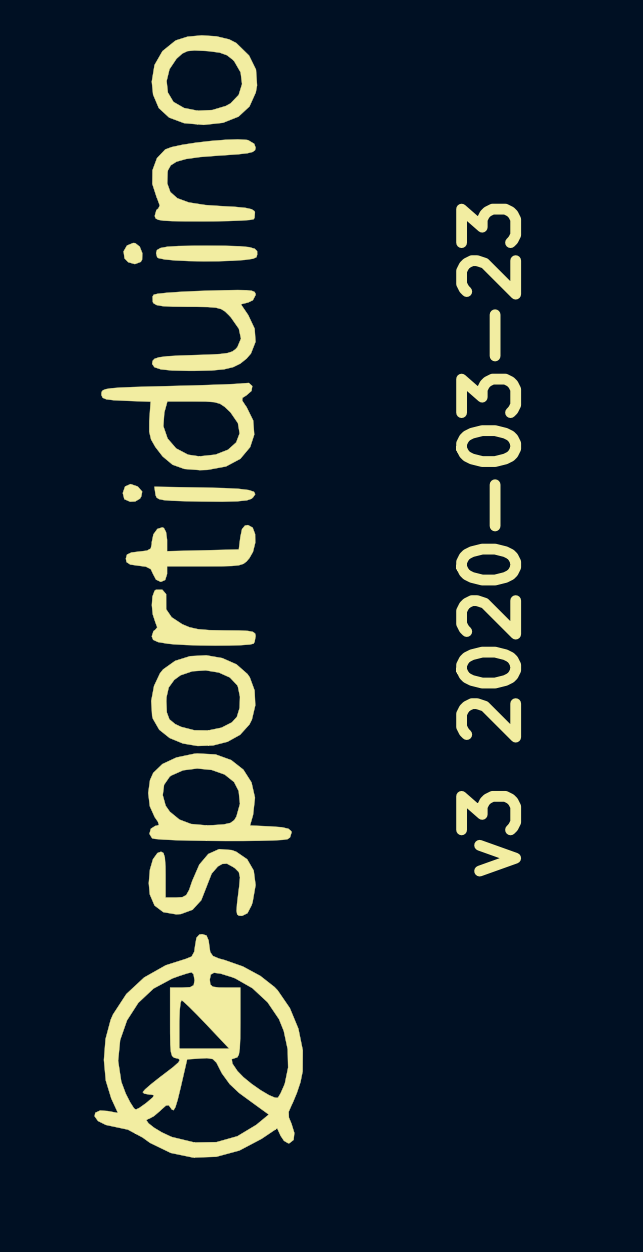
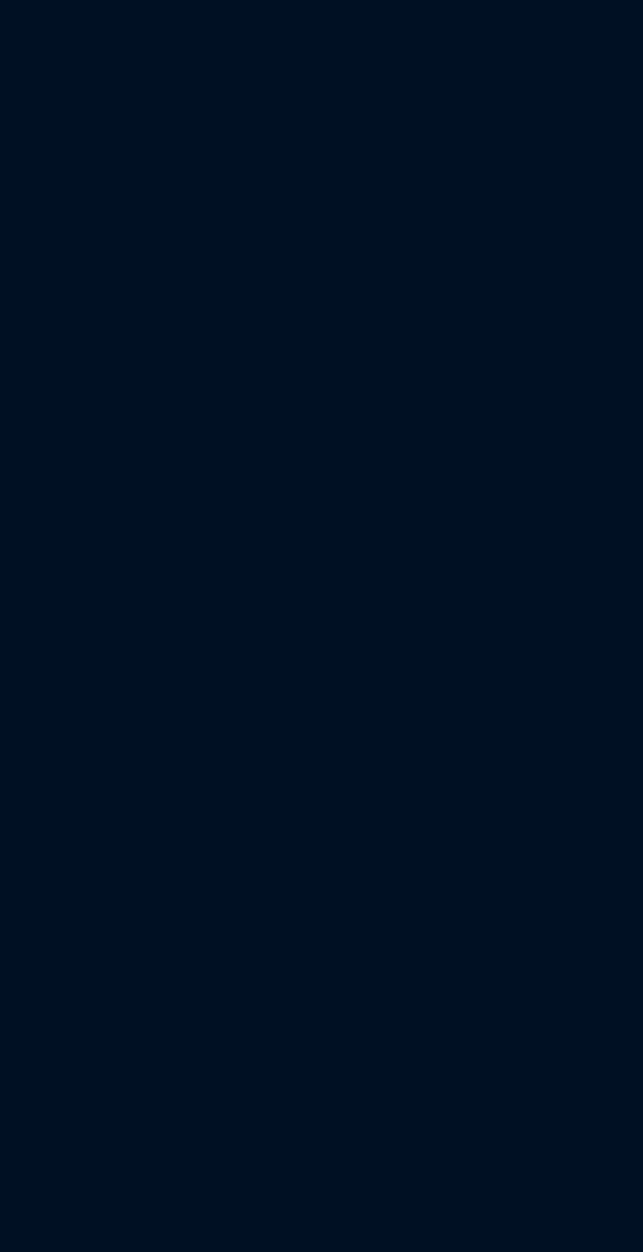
drawing: [94, 35, 303, 1158] -> none
text: v3 2020-03-23 (488, 540) -> none

